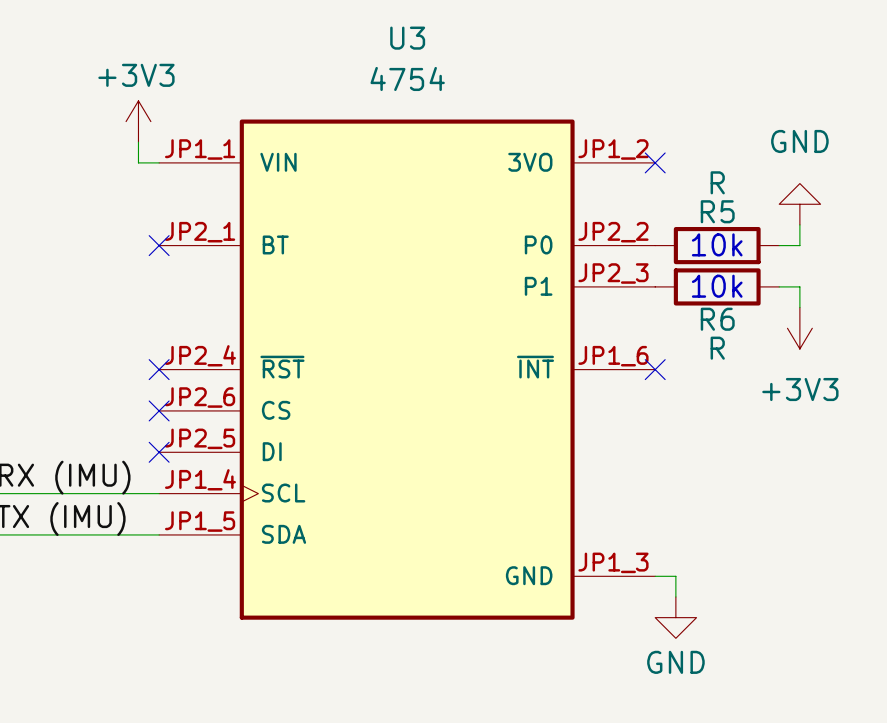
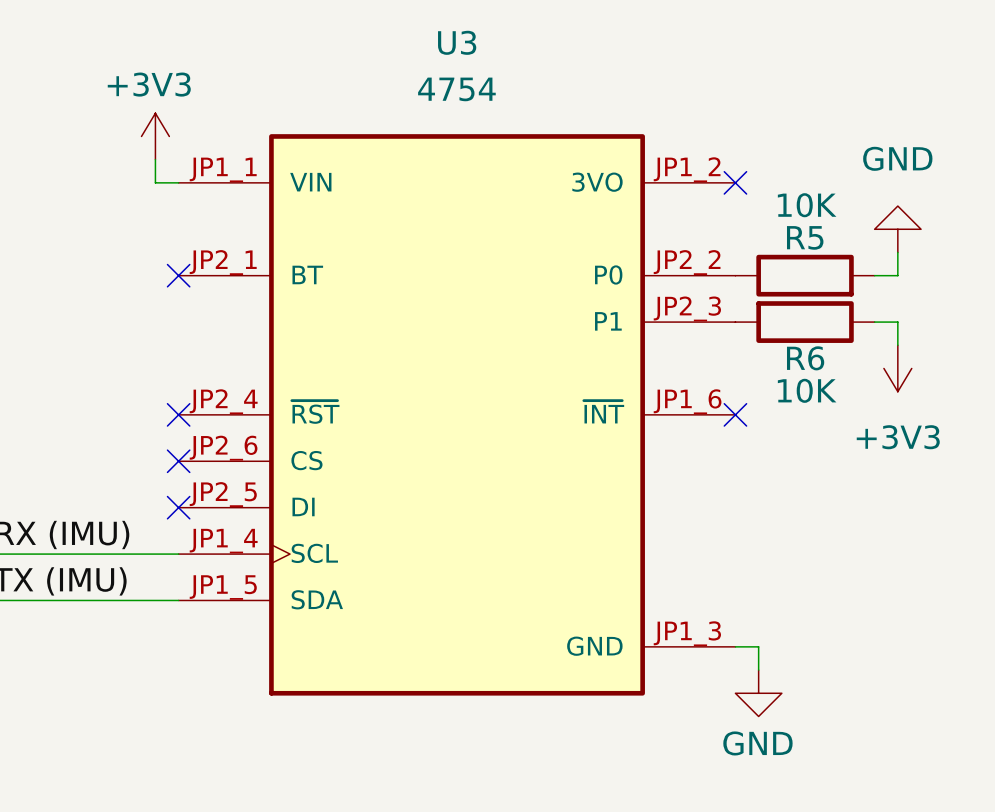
R5 value: R (717, 182) -> 10K (807, 205)
text: 10k (717, 244) -> none
text: 10k (717, 286) -> none
R6 value: R (717, 348) -> 10K (807, 390)

